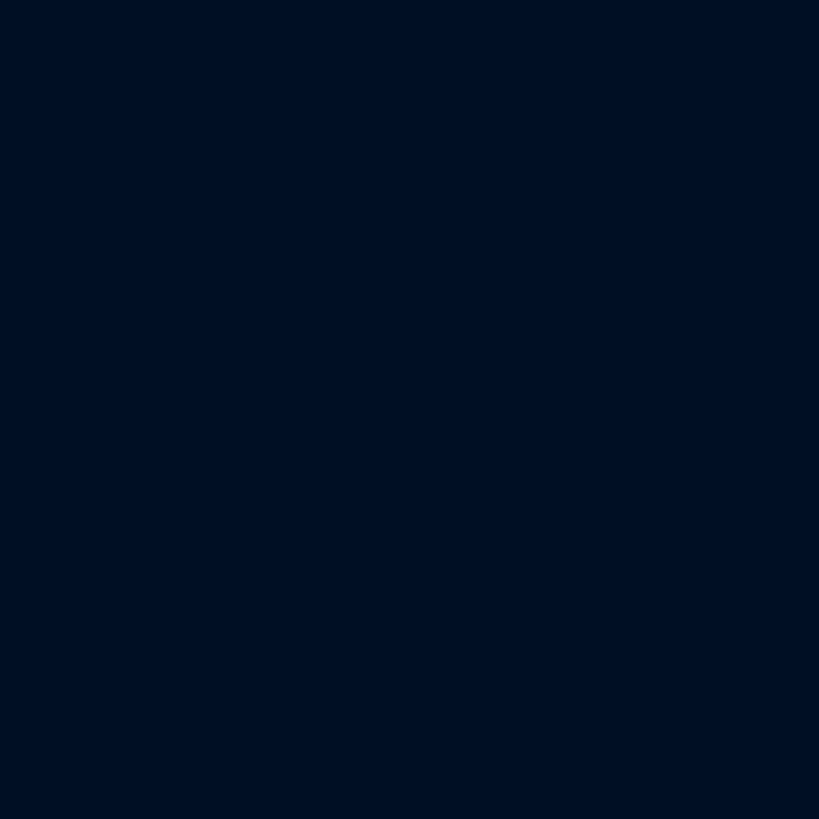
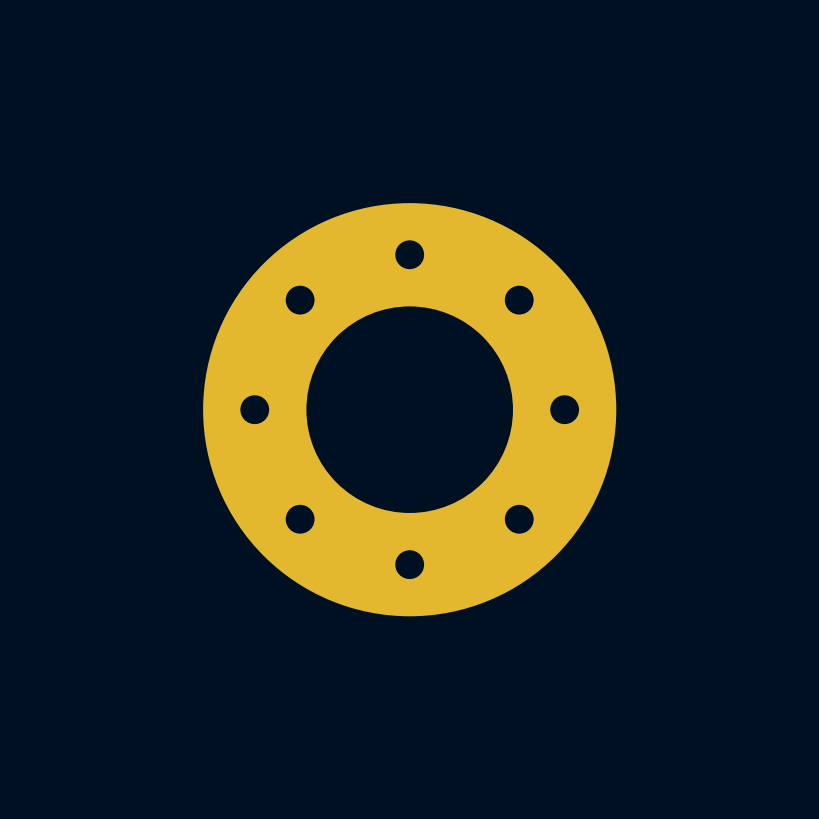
part: none -> (409, 409)

